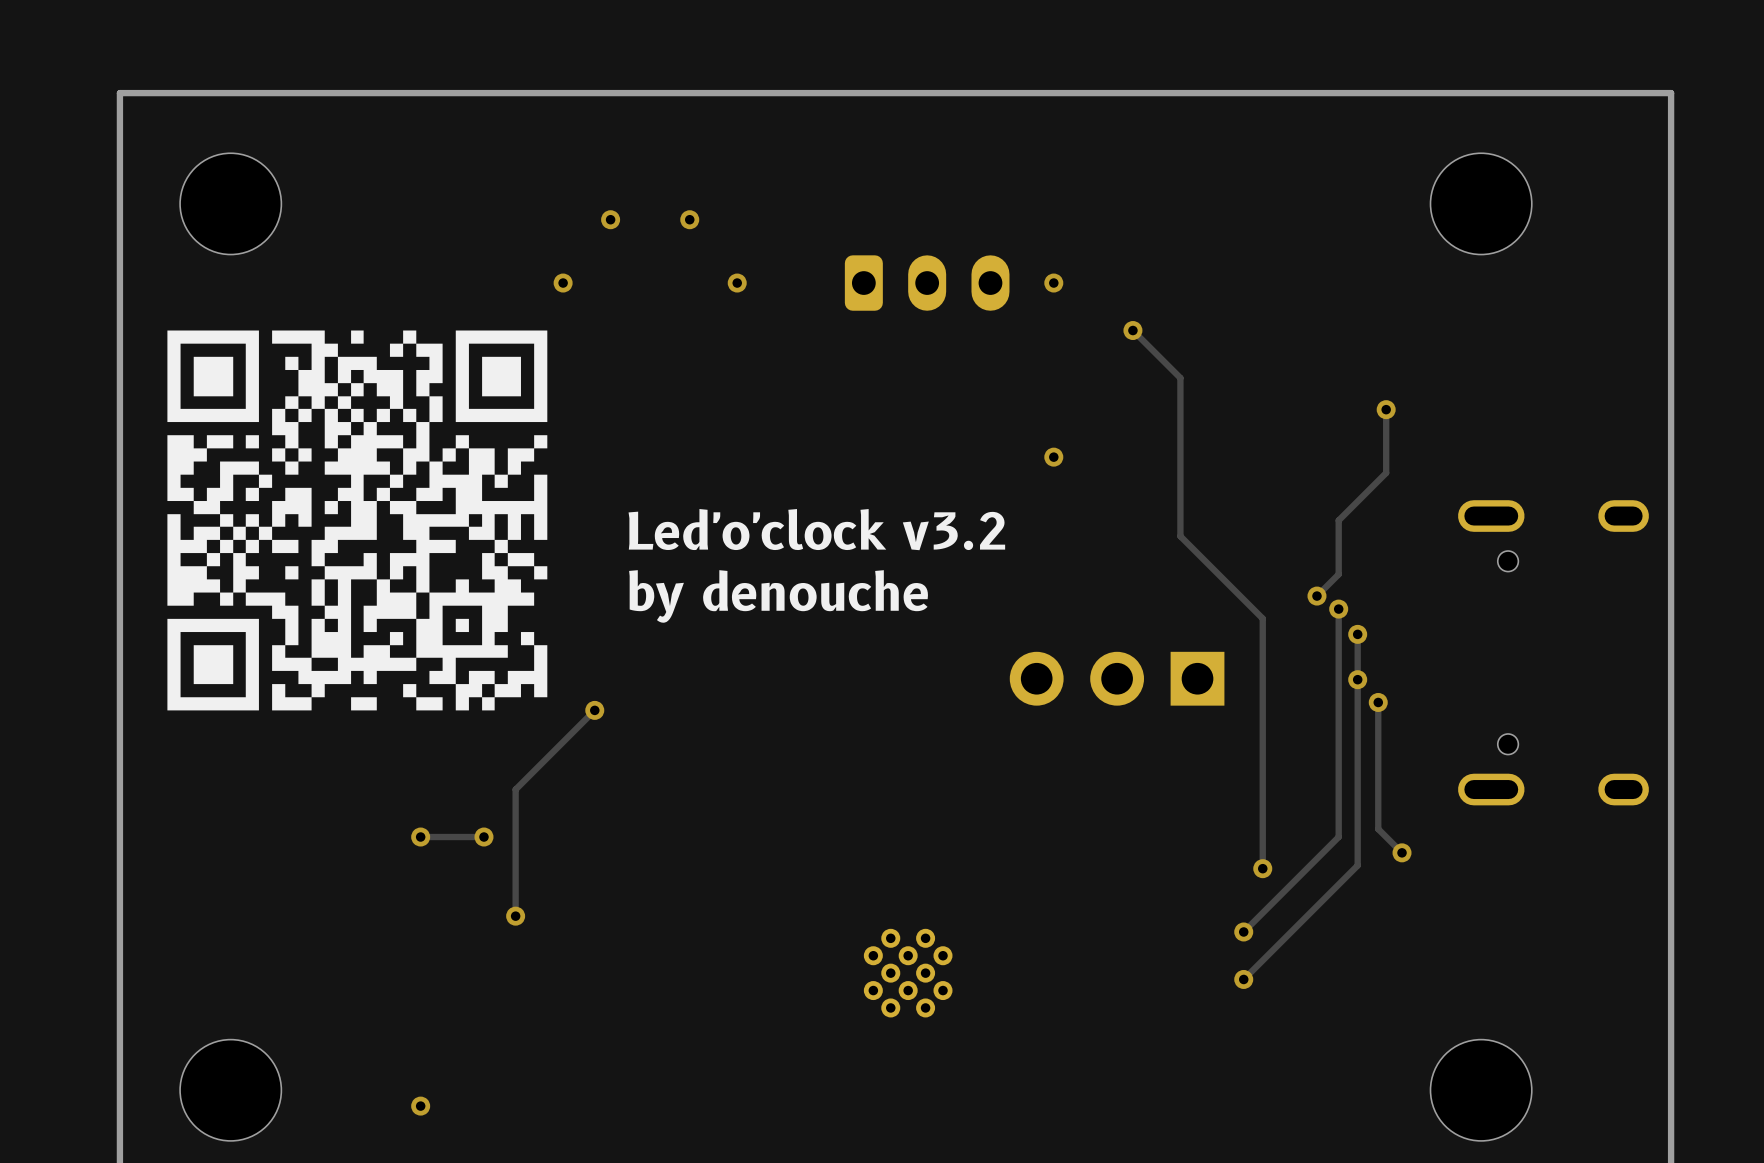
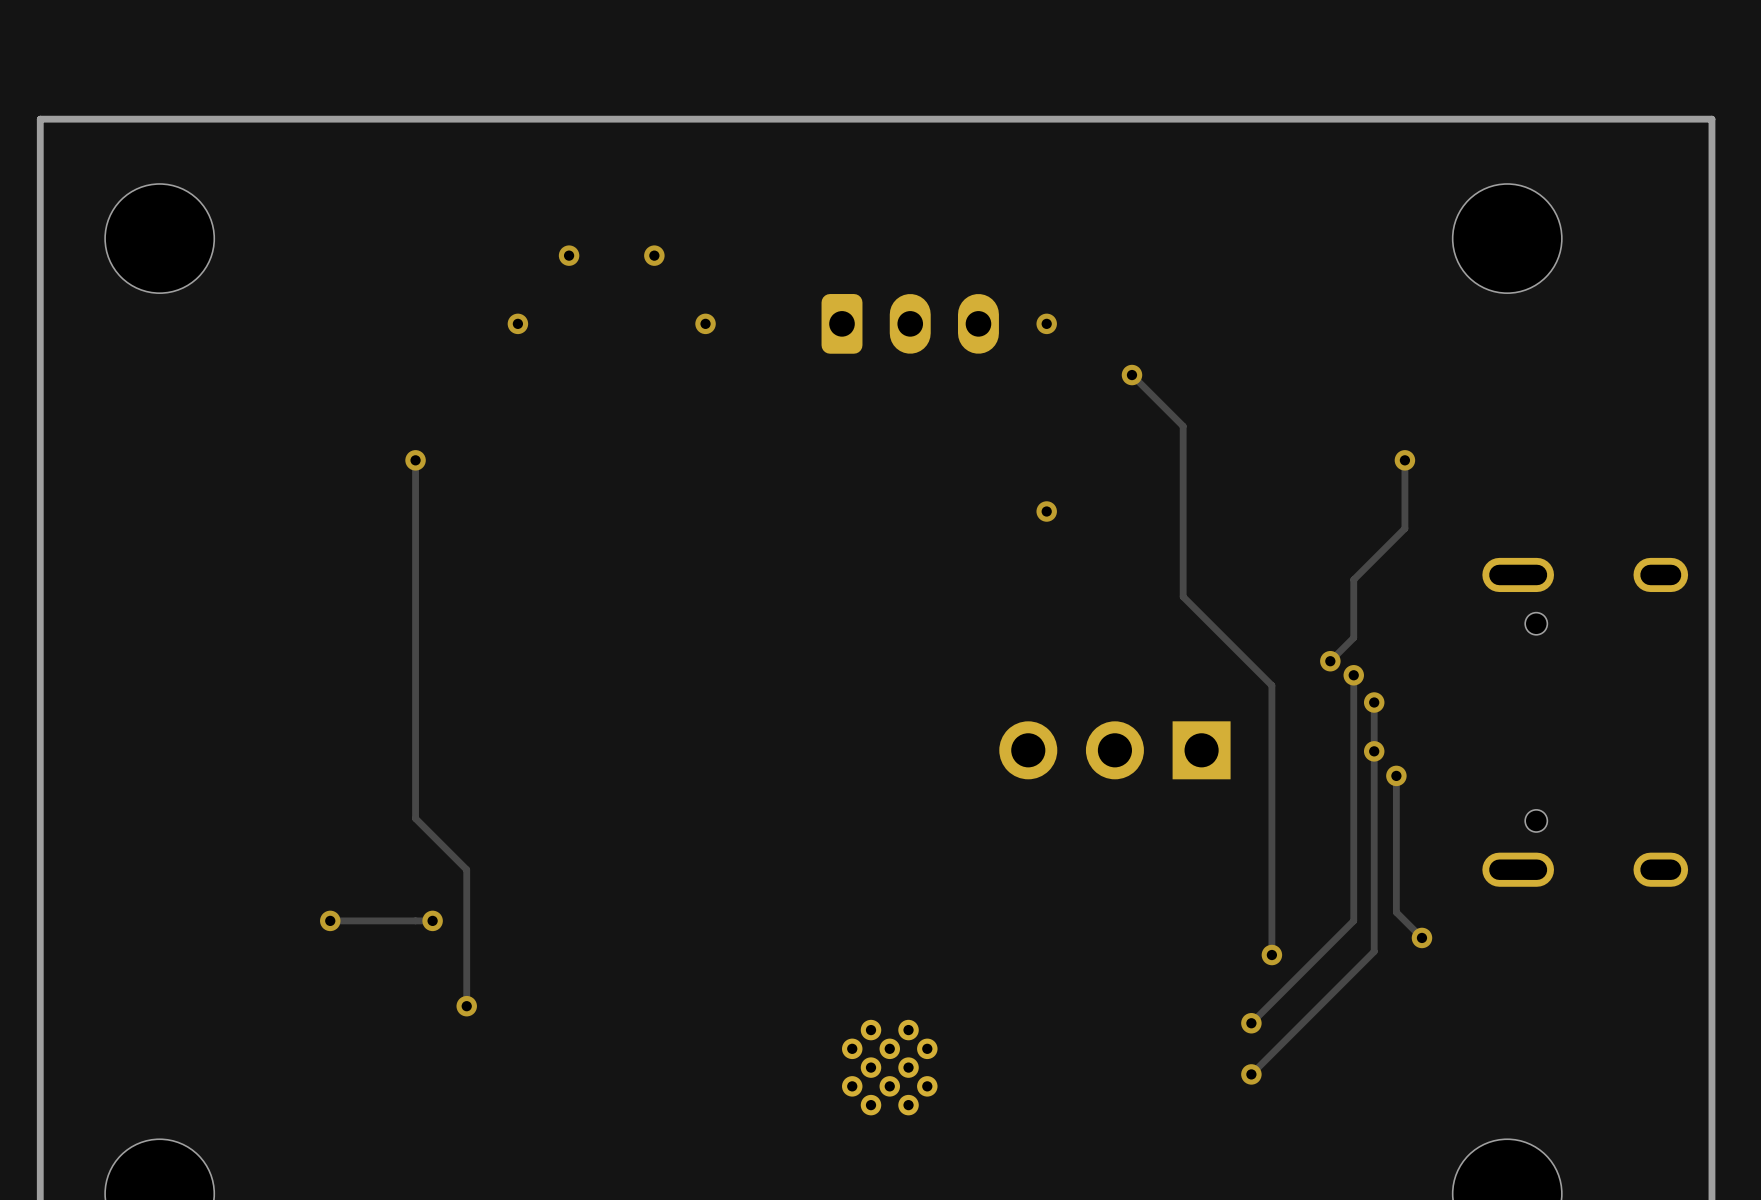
drawing: [167, 330, 548, 711] -> none
via: none -> (415, 460)
text: Led'o'clock v3.2 (816, 529) -> none
text: by denouche (778, 596) -> none
track: (594, 710) (515, 789) -> (415, 460) (415, 818) (466, 869)
via: (594, 710) -> none
track: none -> (364, 920) (330, 920)
via position: (420, 837) -> (330, 920)

